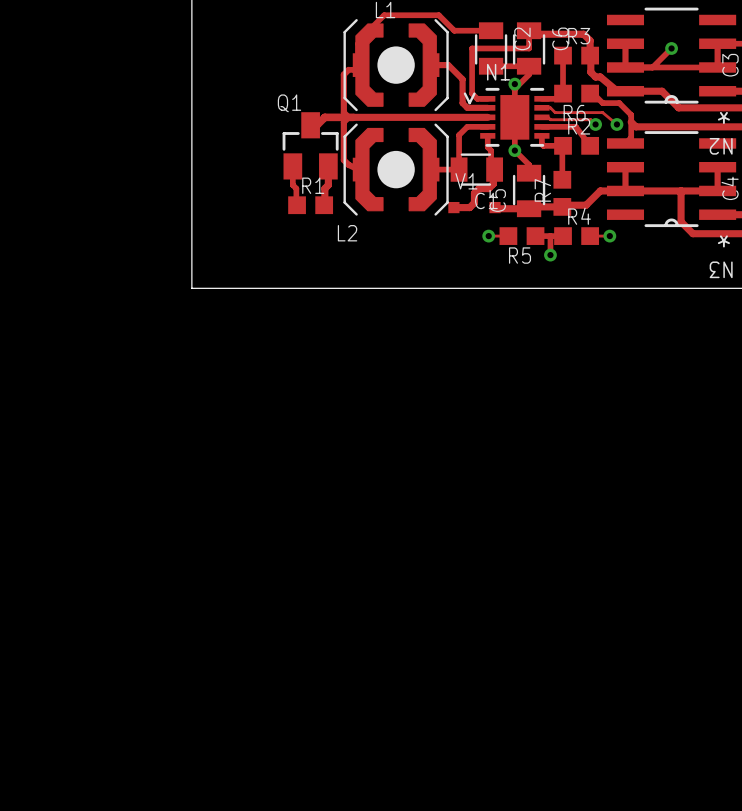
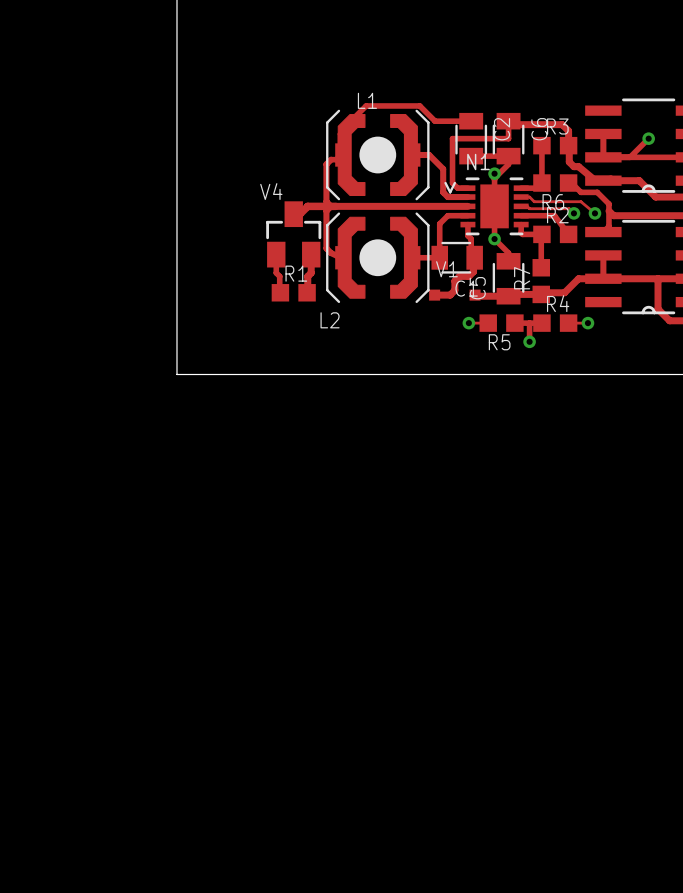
Q1 name: Q1 (289, 103) -> V4 (271, 191)

